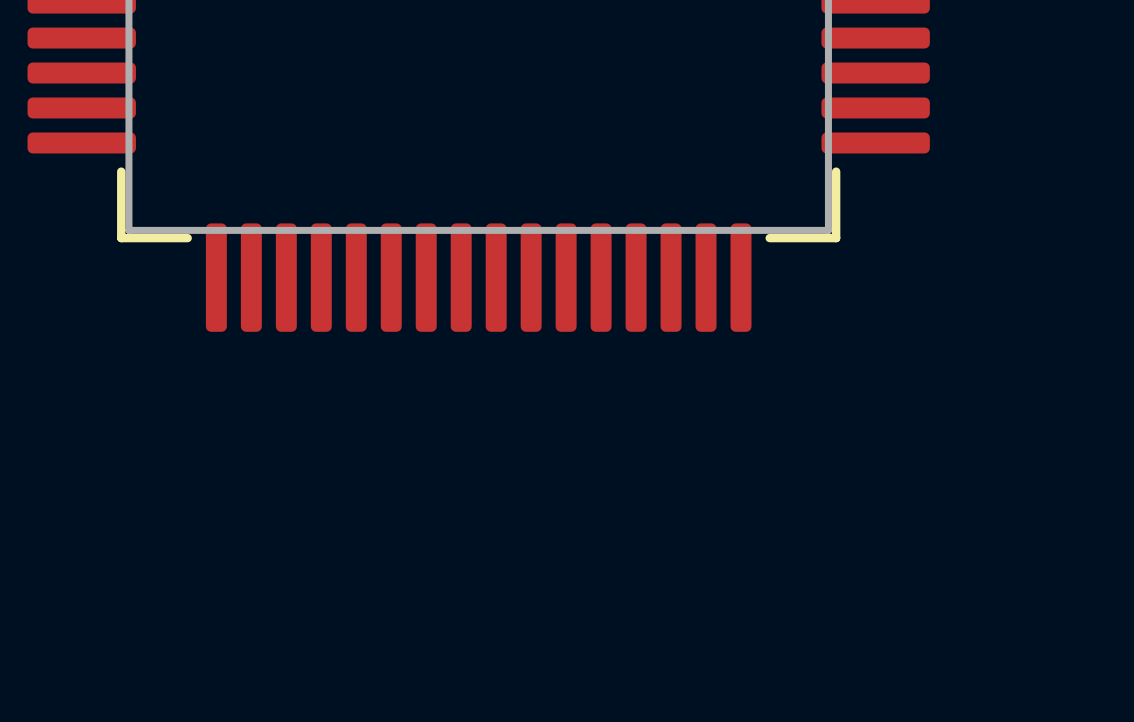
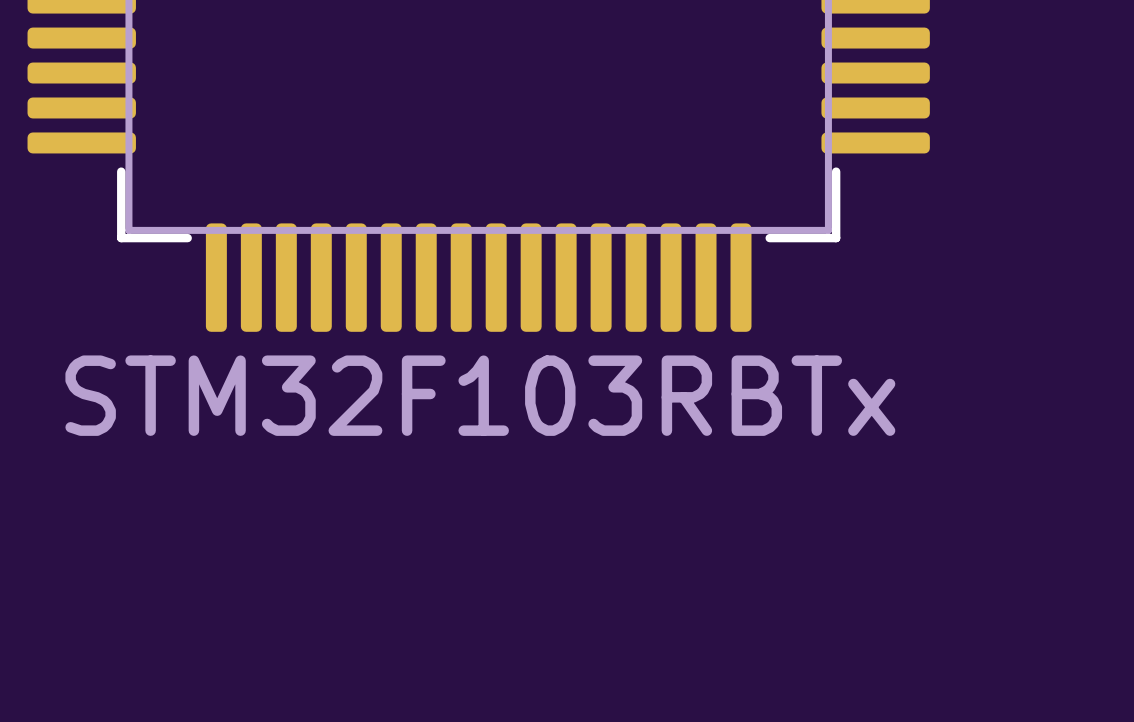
part value: none -> STM32F103RBTx (480, 395)

